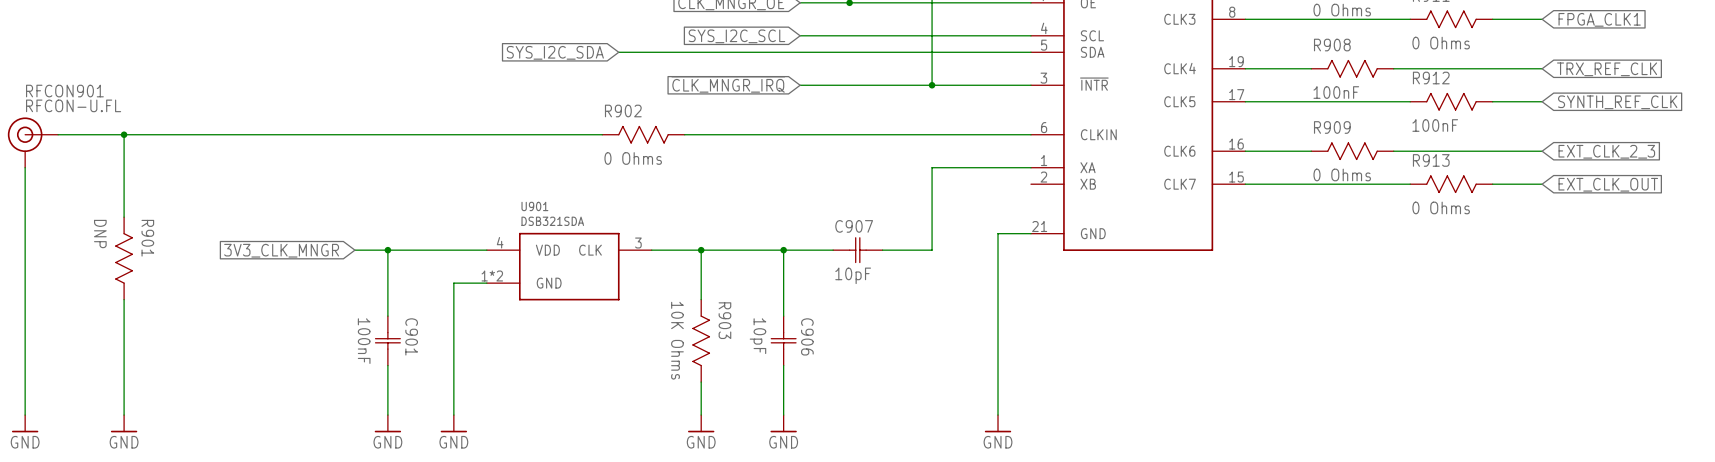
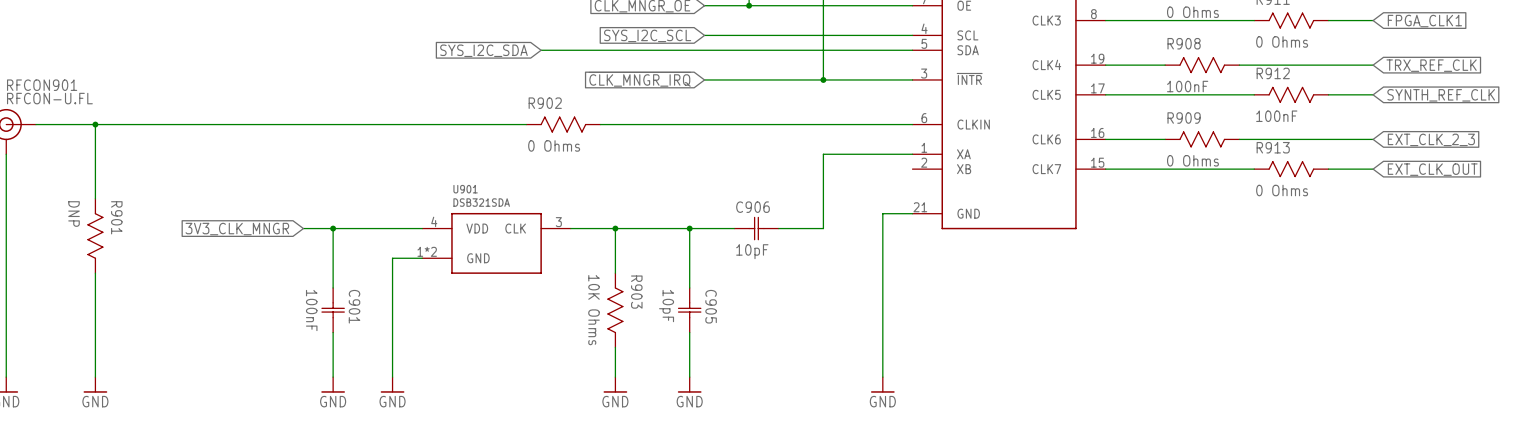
C907 name: C907 (854, 226) -> C906 (752, 207)
C906 name: C906 (807, 336) -> C905 (711, 306)

